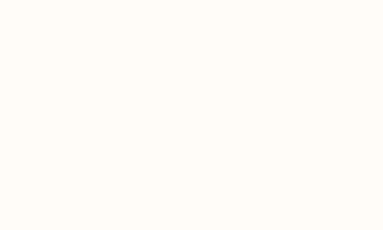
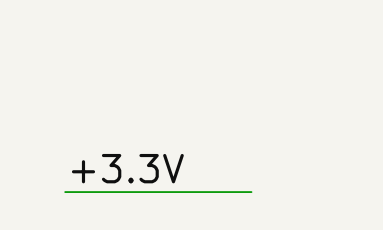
label: none -> +3.3V (127, 168)
wire: none -> (65, 192) (251, 192)

